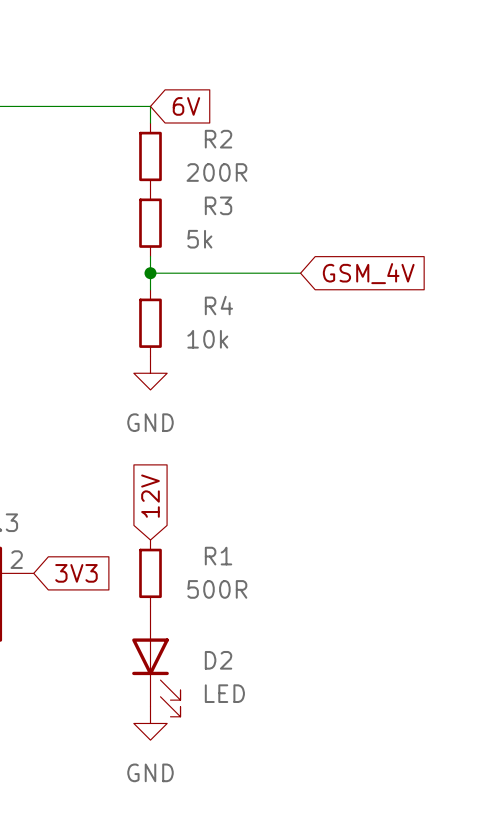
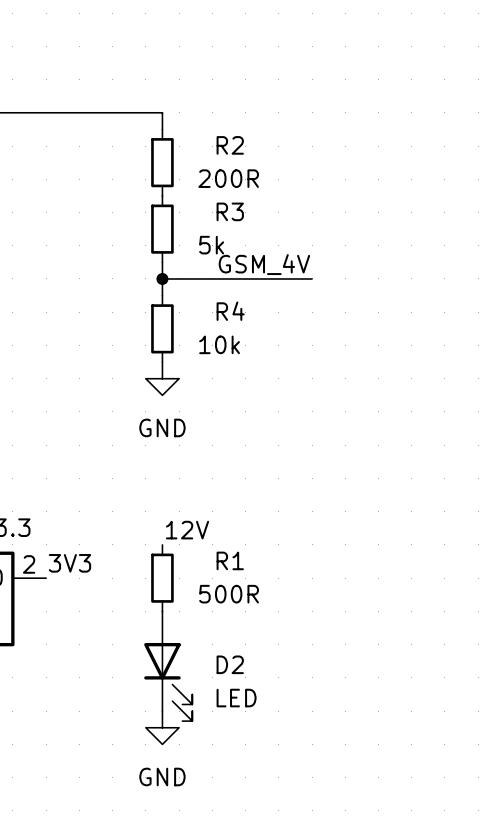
global label: 6V (186, 106) -> none
label: none -> GSM_4V (264, 264)
global label: GSM_4V (368, 273) -> none
global label: 12V (150, 496) -> none
label: none -> 12V (187, 530)
label: none -> 3V3 (69, 563)
global label: 3V3 (76, 573) -> none

